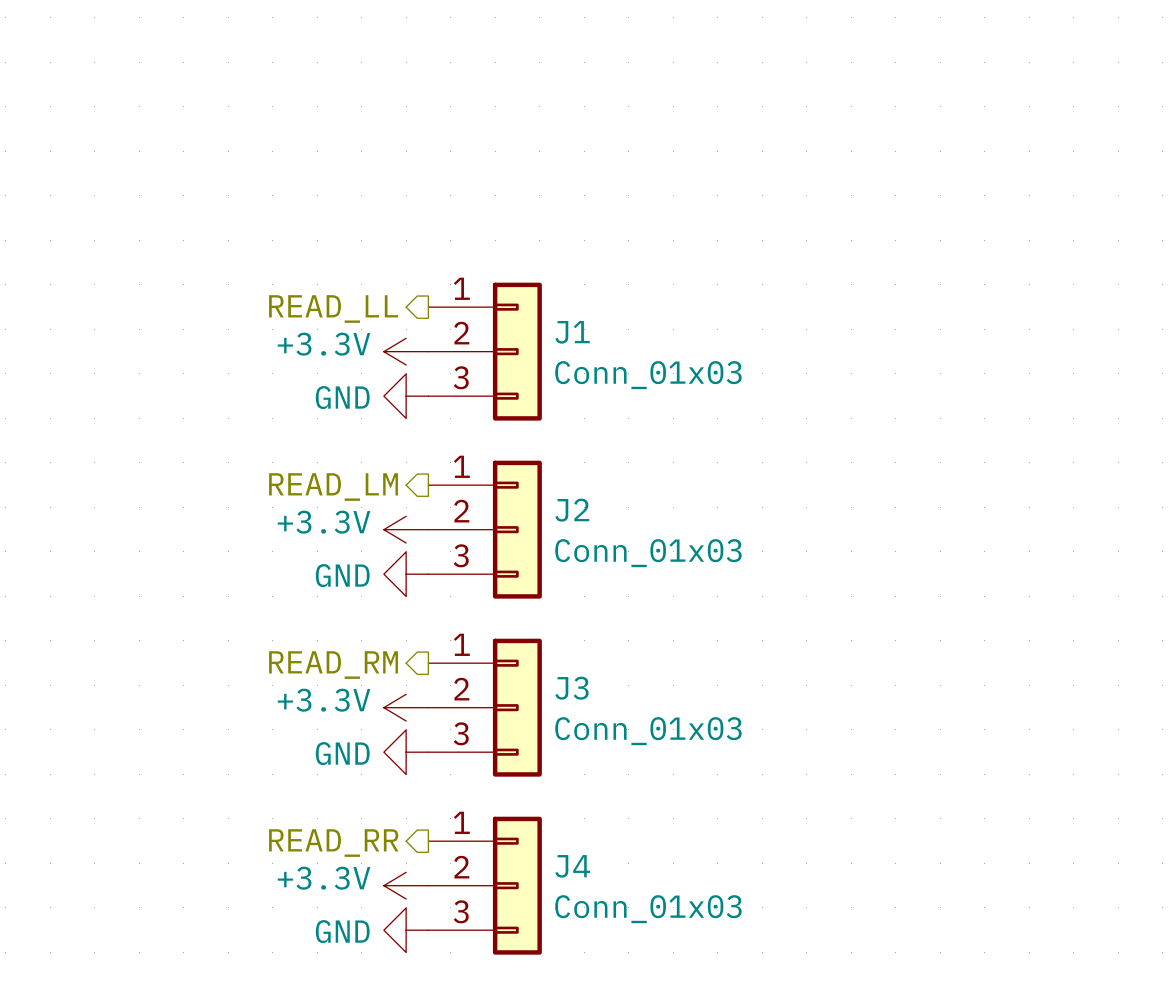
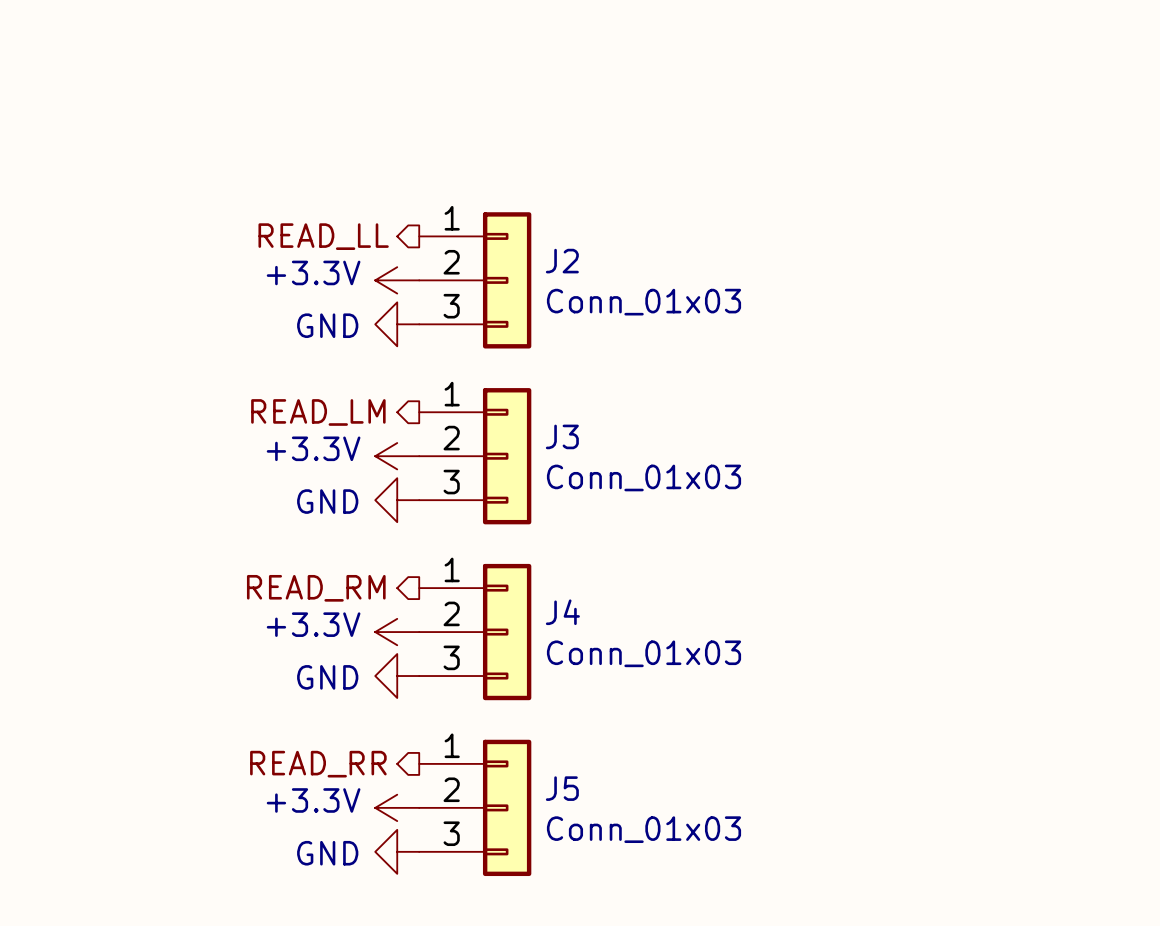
J1 name: J1 (572, 332) -> J2 (562, 261)
J2 name: J2 (572, 510) -> J3 (562, 436)
J3 name: J3 (571, 688) -> J4 (562, 612)
J4 name: J4 (572, 866) -> J5 (562, 788)

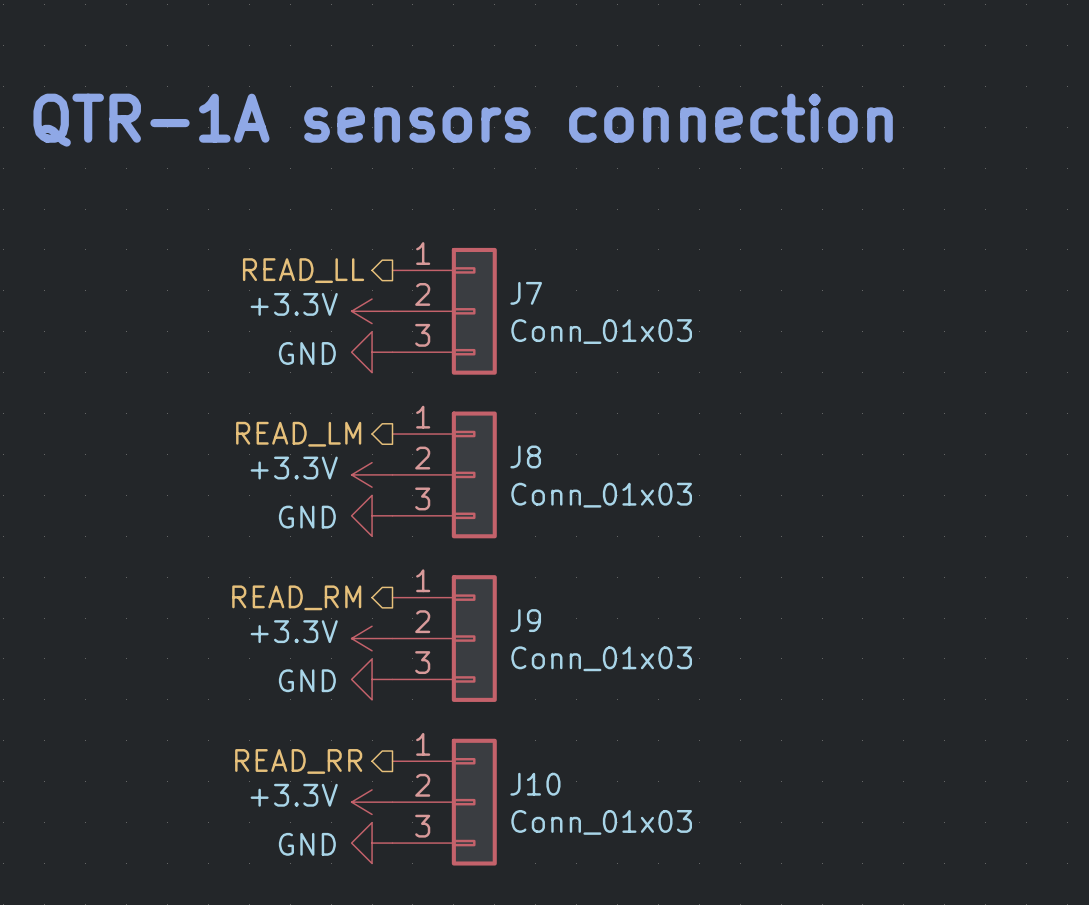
text: none -> QTR-1A sensors connection (463, 120)
J2 name: J2 (562, 261) -> J7 (526, 293)
J3 name: J3 (562, 436) -> J8 (525, 456)
J4 name: J4 (562, 612) -> J9 (525, 620)
J5 name: J5 (562, 788) -> J10 (535, 784)

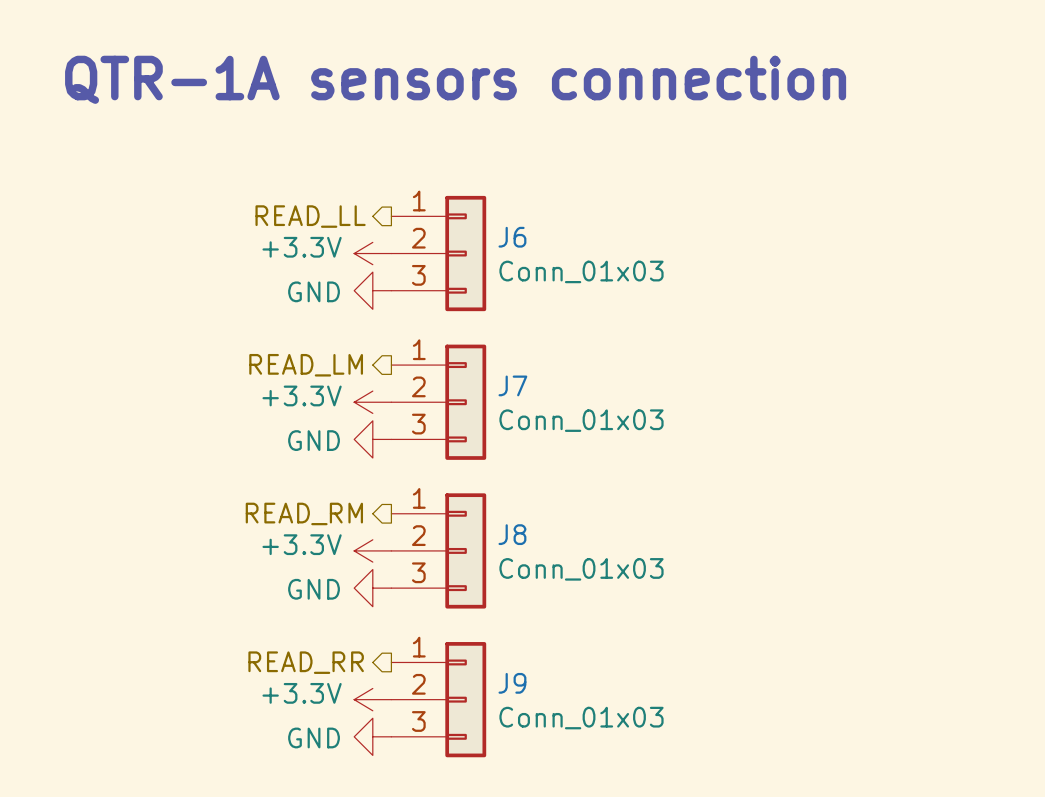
J7 name: J7 (526, 293) -> J6 (512, 237)
J8 name: J8 (525, 456) -> J7 (512, 385)
J9 name: J9 (525, 620) -> J8 (512, 534)
J10 name: J10 (535, 784) -> J9 (512, 683)

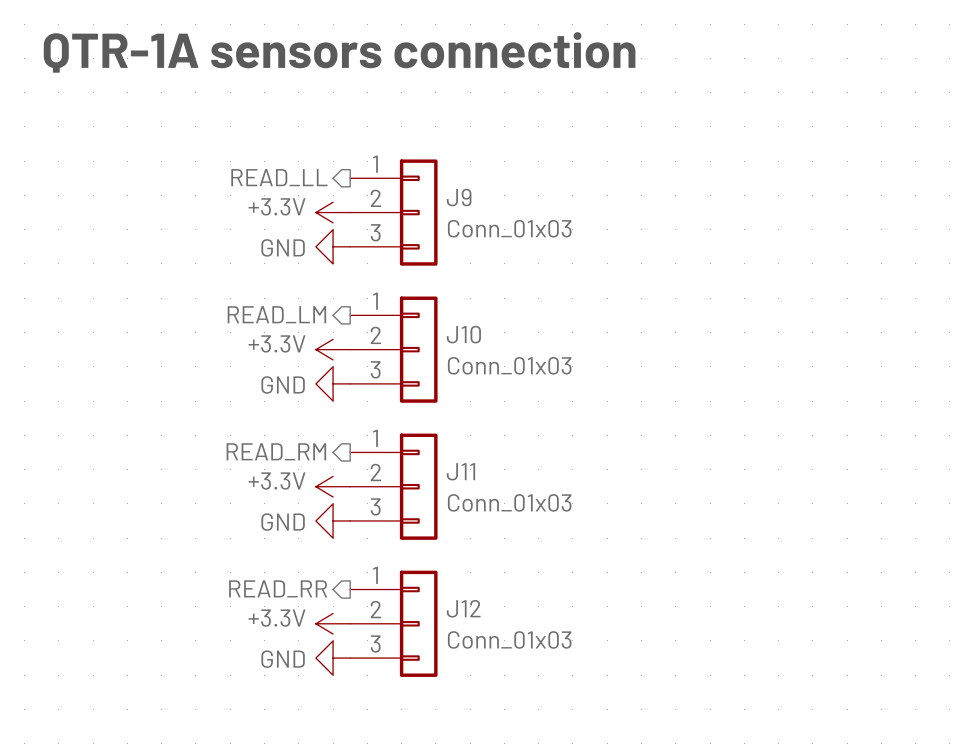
J6 name: J6 (512, 237) -> J9 (459, 197)
J7 name: J7 (512, 385) -> J10 (463, 334)
J8 name: J8 (512, 534) -> J11 (460, 471)
J9 name: J9 (512, 683) -> J12 (463, 608)

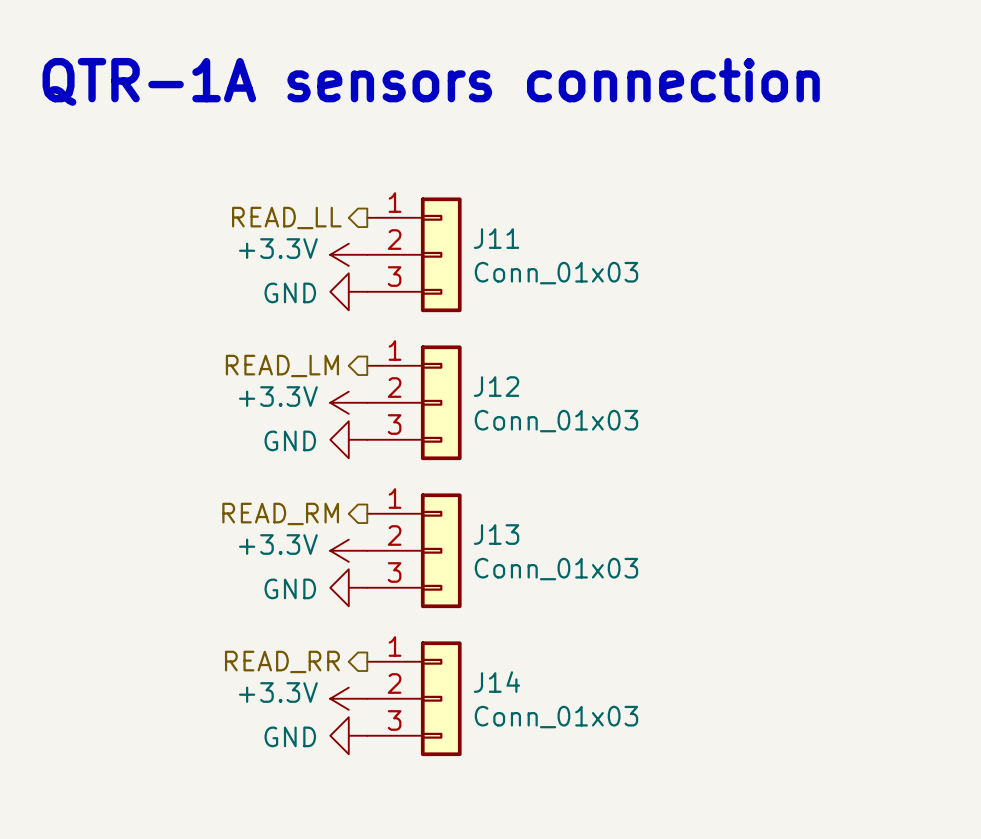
J9 name: J9 (459, 197) -> J11 (496, 238)
J10 name: J10 (463, 334) -> J12 (496, 386)
J11 name: J11 (460, 471) -> J13 (496, 534)
J12 name: J12 (463, 608) -> J14 (496, 682)

